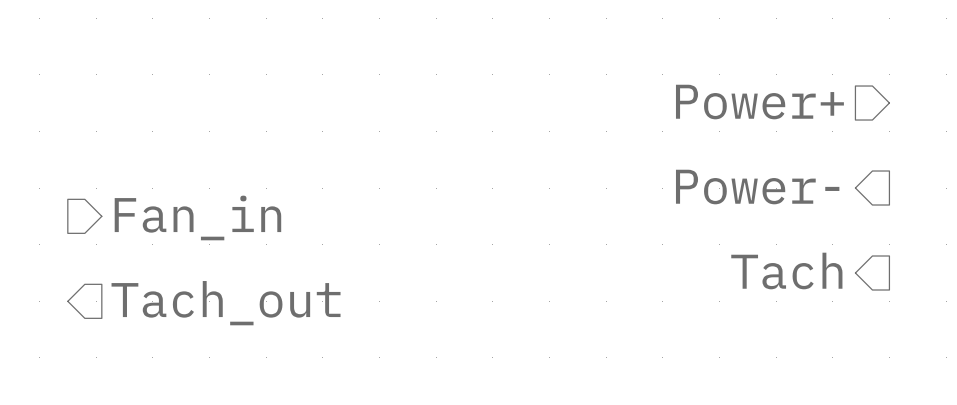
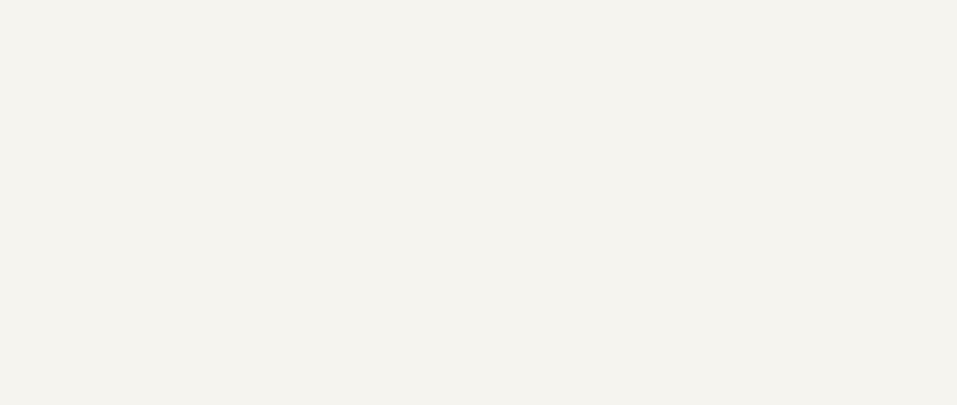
hierarchical label: Power+ (759, 102) -> none
hierarchical label: Power- (757, 187) -> none
hierarchical label: Fan_in (197, 217) -> none
hierarchical label: Tach (786, 271) -> none
hierarchical label: Tach_out (226, 303) -> none

